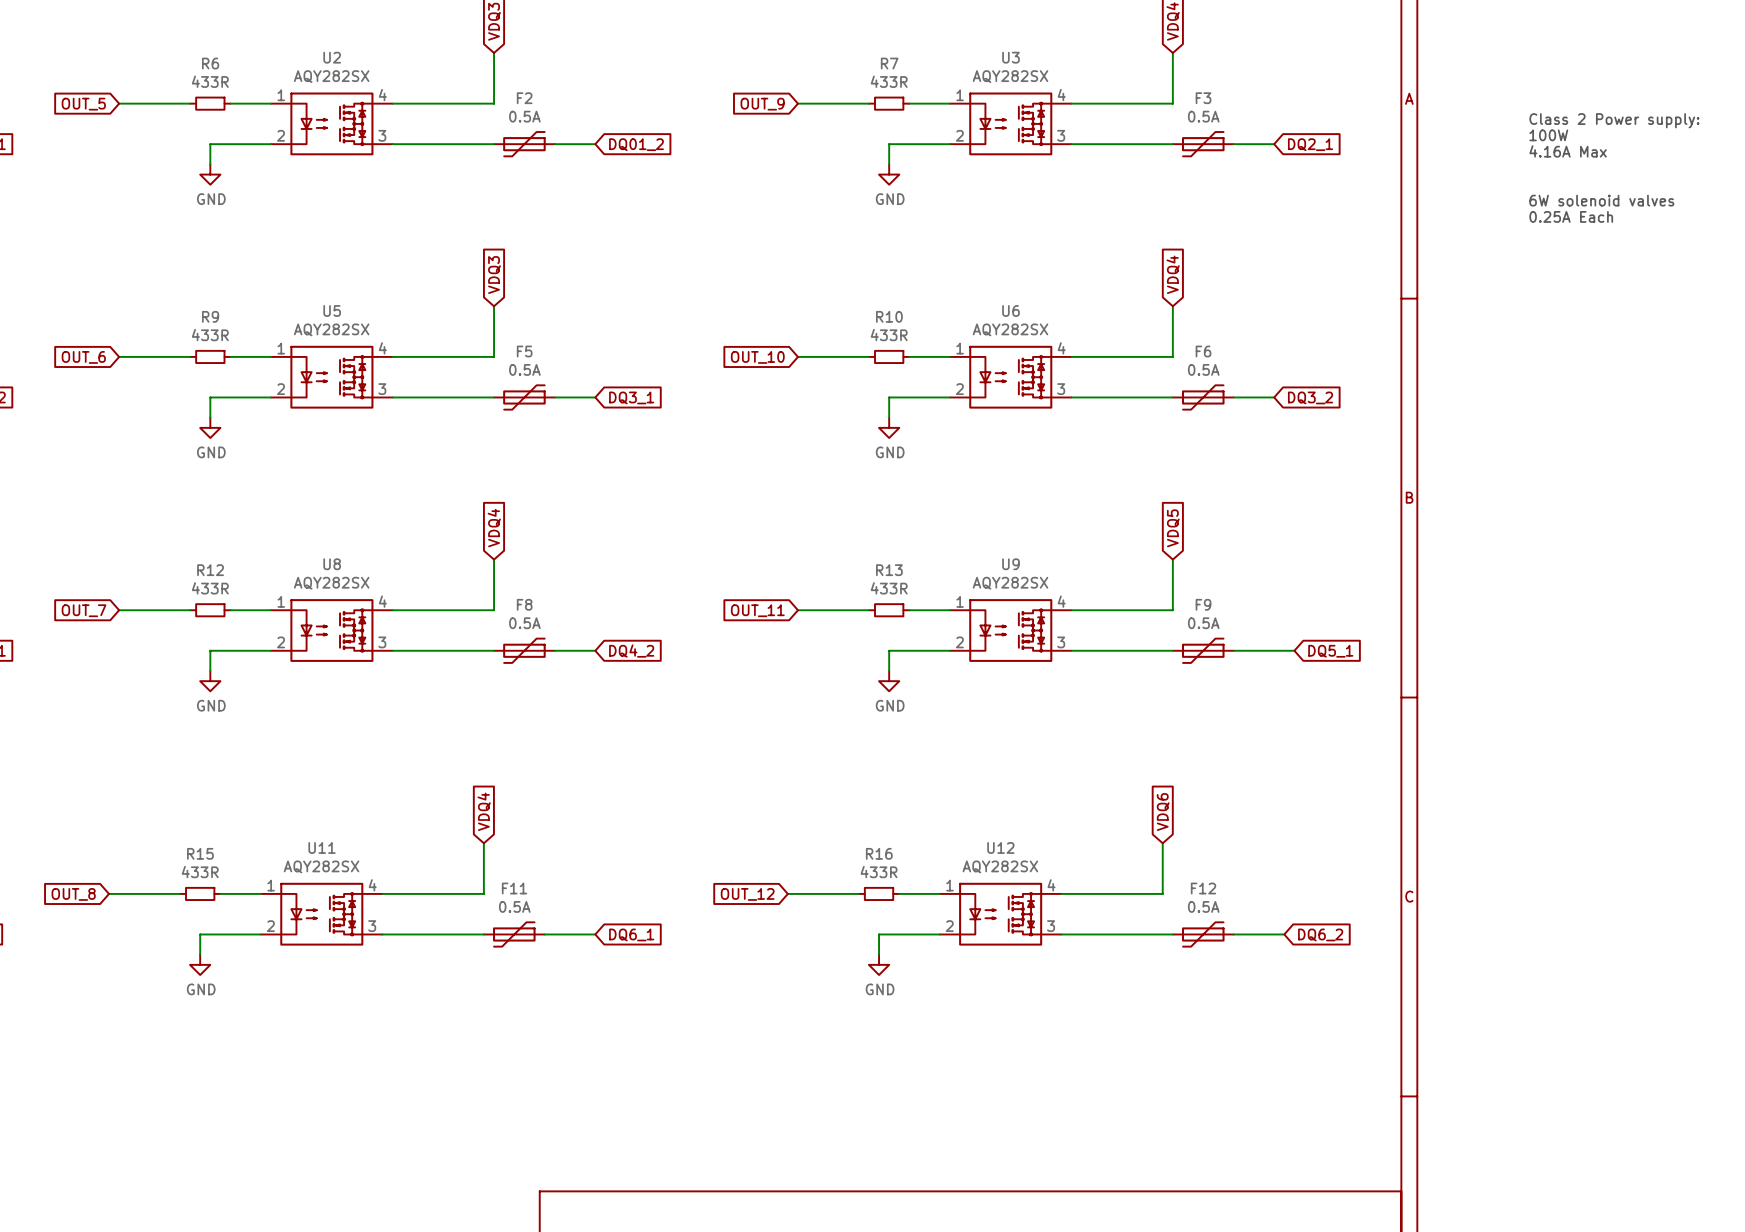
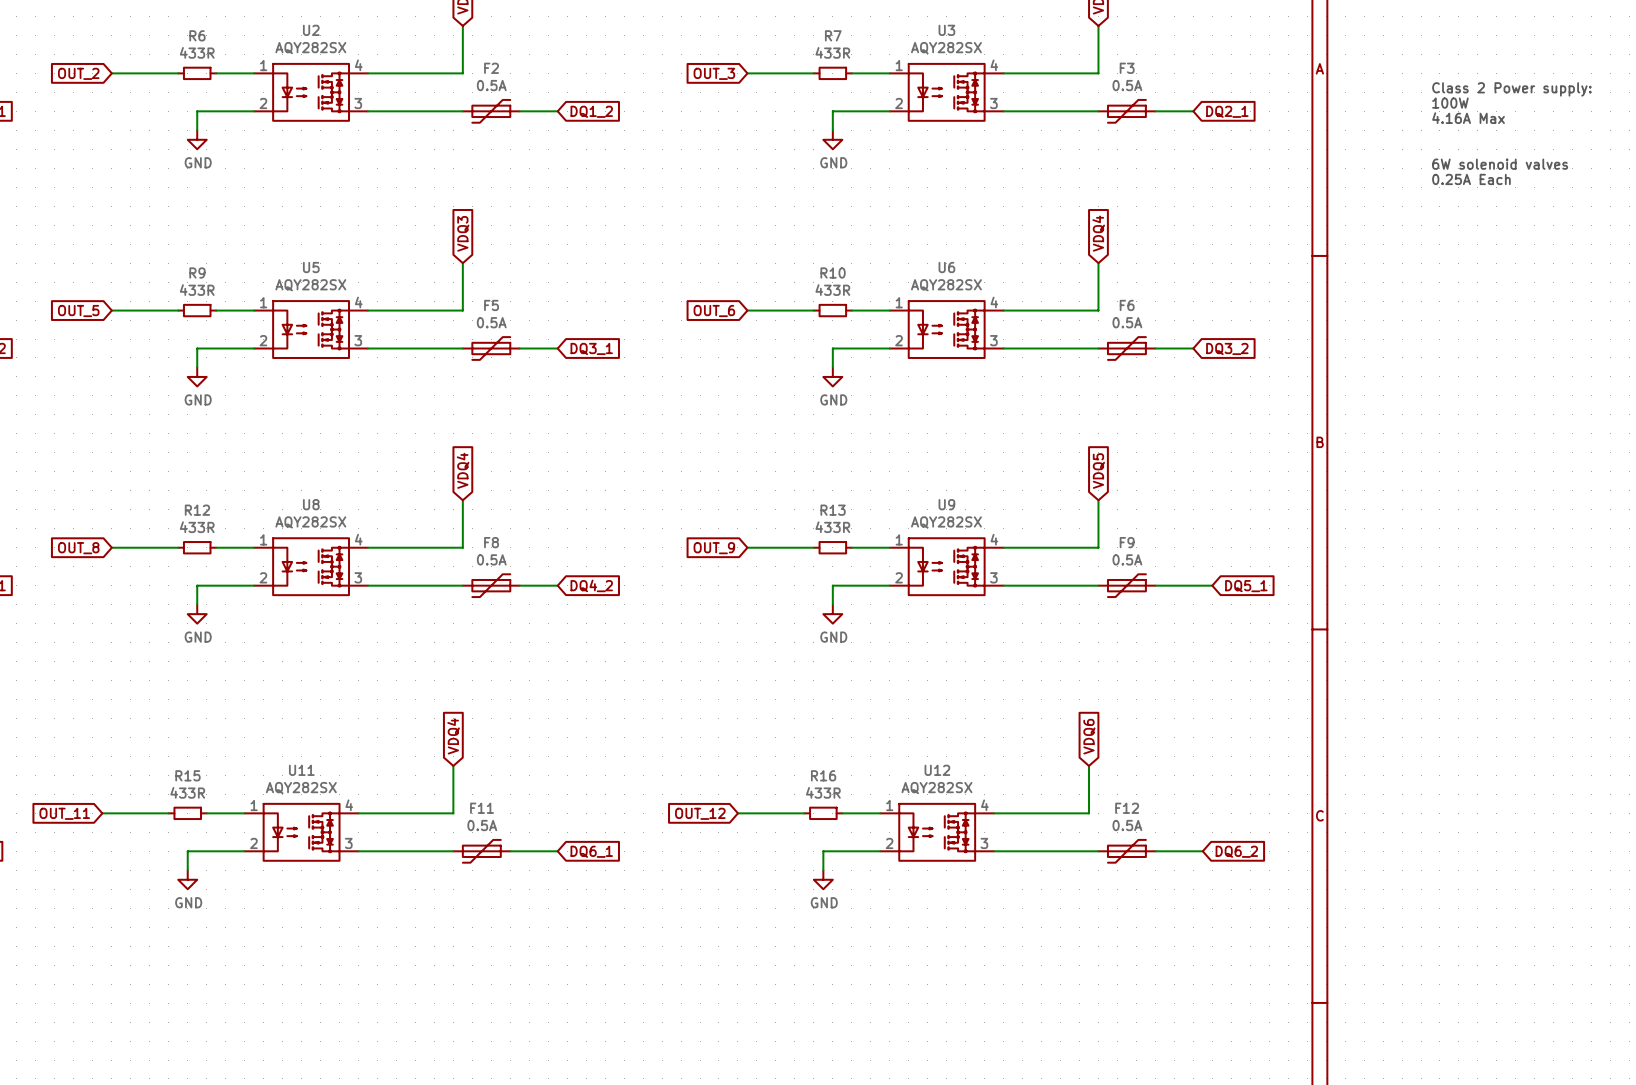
global label: OUT_5 (83, 104) -> OUT_2 (78, 73)
global label: OUT_9 (762, 104) -> OUT_3 (714, 73)
global label: DQ01_2 (636, 144) -> DQ1_2 (591, 111)
global label: OUT_6 (83, 357) -> OUT_5 (78, 311)
global label: OUT_10 (757, 357) -> OUT_6 (714, 311)
global label: OUT_7 (84, 610) -> OUT_8 (78, 548)
global label: OUT_11 (757, 610) -> OUT_9 (714, 548)
global label: OUT_8 (73, 894) -> OUT_11 (64, 813)

